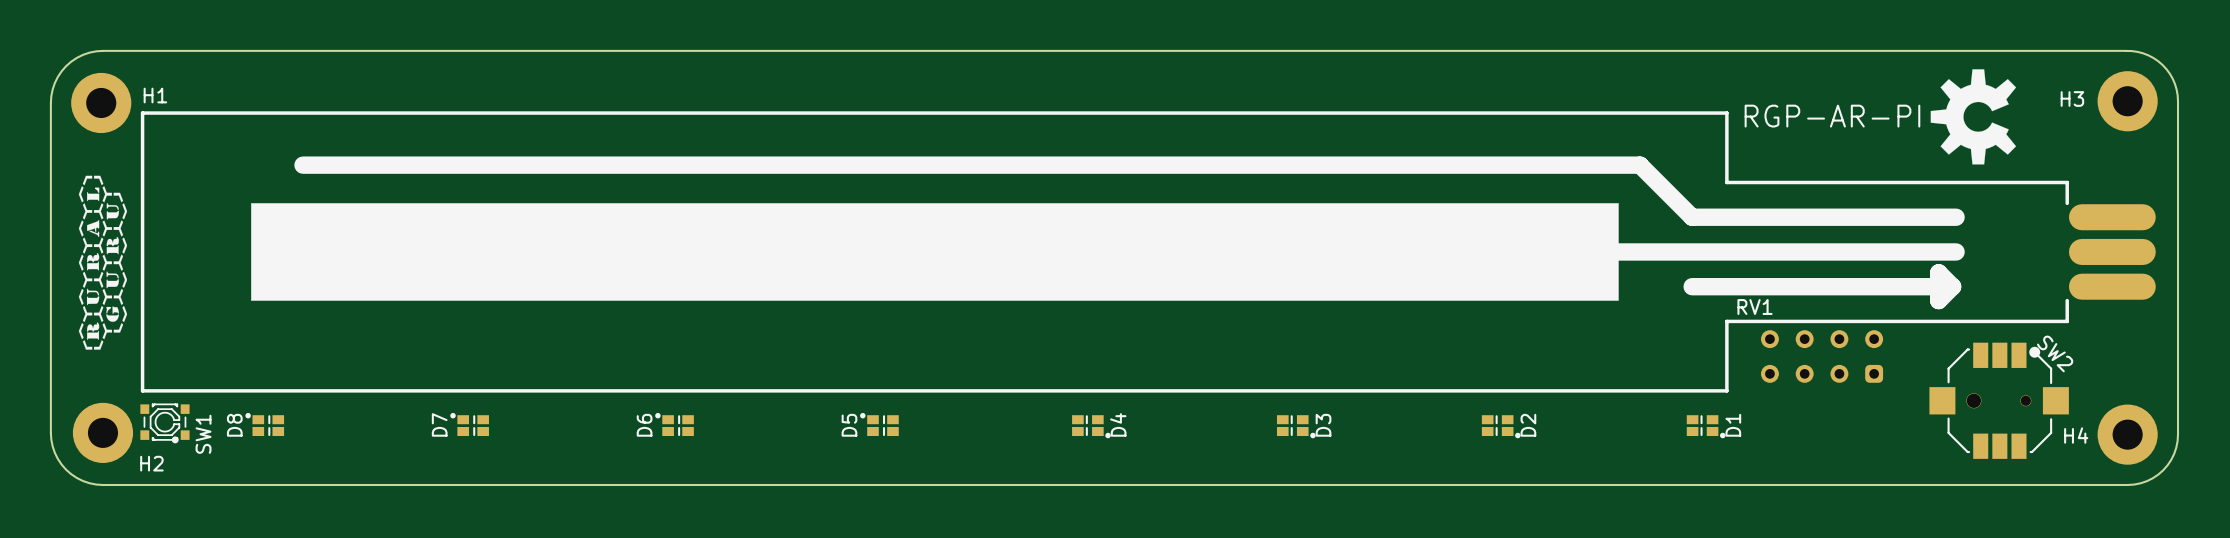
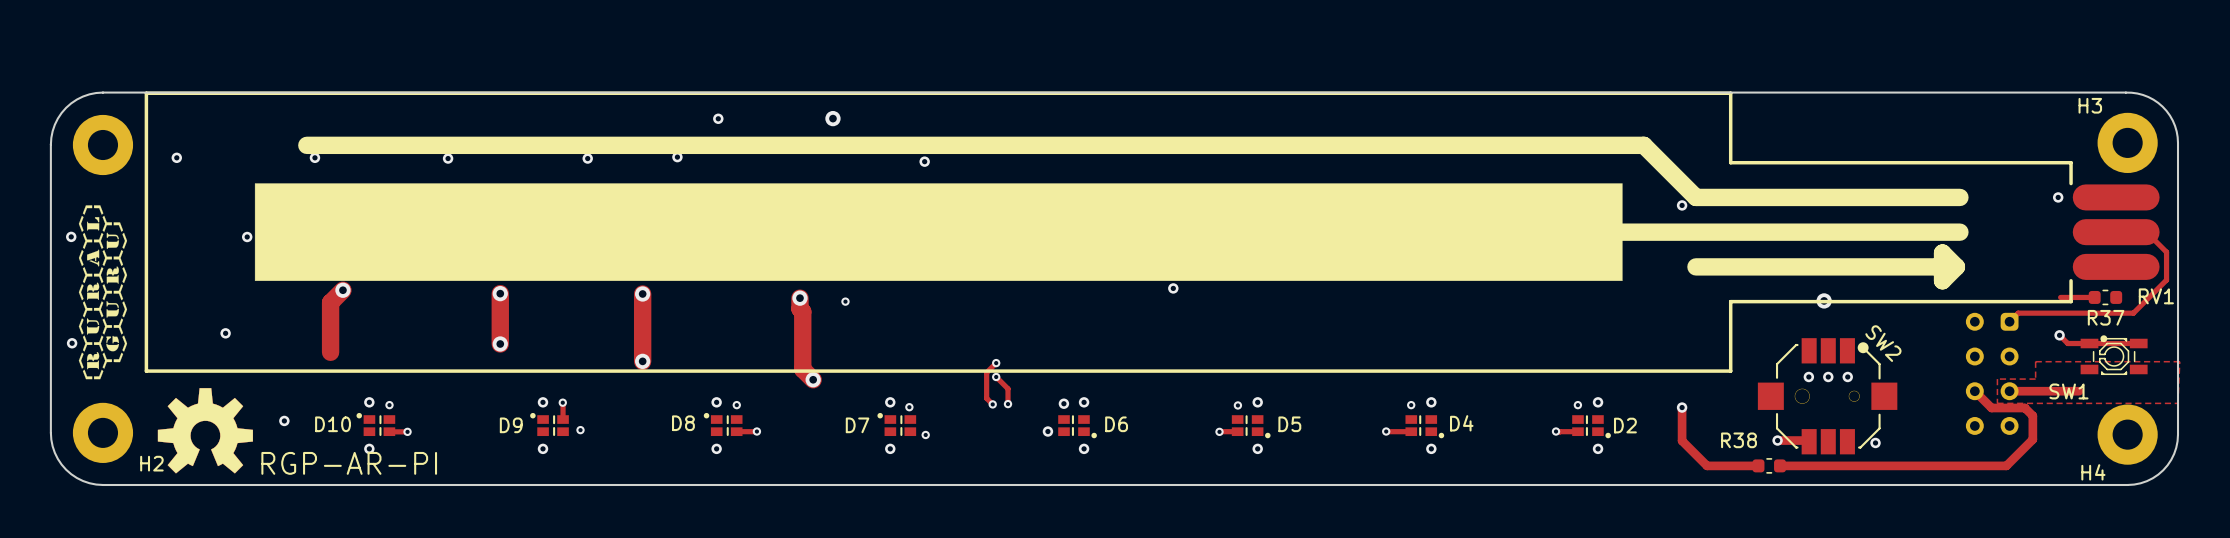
board edge: (2125, 50) (2137, 51) (2153, 58) (2162, 65) (2172, 78) (2177, 95) (2178, 142) -> (2125, 92) (2148, 97) (2162, 106) (2172, 120) (2178, 142)
board edge: (2125, 50) (102, 50) (89, 52) (76, 57) (66, 66) (57, 76) (51, 96) (50, 144) -> (2125, 92) (102, 92) (83, 96) (66, 107) (54, 124) (50, 144)
drawing: [1930, 69, 2017, 165] -> none
H3 name position: H3 (2072, 98) -> H3 (2090, 105)
H3 position: (2127, 101) -> (2127, 142)
H1: (101, 102) -> none
via: none -> (718, 118)
via: none -> (832, 118)
part: none -> (102, 145)
via: none -> (176, 157)
via: none -> (314, 157)
via: none -> (677, 157)
via: none -> (448, 158)
via: none -> (587, 158)
via: none -> (924, 161)
via: none -> (2058, 197)
via: none -> (1682, 205)
track: none -> (2116, 232) (2146, 232) (2166, 252) (2166, 280) (2133, 313) (2018, 313) (2009, 321)
via: none -> (71, 236)
via: none -> (247, 236)
RV1 position: (1148, 251) -> (1152, 232)
drawing position: (102, 262) -> (102, 292)
via: none -> (1173, 288)
track: none -> (342, 290) (330, 302) (330, 352)
via: none -> (342, 290)
track: none -> (500, 293) (500, 343)
via: none -> (500, 293)
track: none -> (642, 293) (642, 361)
via: none -> (642, 293)
track: none -> (2060, 297) (2094, 297)
R37: none -> (2105, 297)
track: none -> (799, 298) (799, 308) (802, 311) (802, 369) (813, 379)
via: none -> (799, 298)
via: none -> (1824, 300)
via: none -> (845, 301)
RV1 name position: RV1 (1755, 307) -> RV1 (2156, 296)
via: none -> (225, 333)
track: none -> (2059, 335) (2067, 343) (2138, 343) (2135, 343)
via: none -> (2059, 335)
via: none -> (72, 343)
via: none -> (500, 343)
SW2 name position: SW2 (2055, 353) -> SW2 (1883, 343)
part rotation: 0° (1822, 356) -> 90° counterclockwise (1992, 373)
part position: (1822, 356) -> (1992, 373)
via: none -> (642, 361)
zone outline: none -> (2035, 361) (2179, 361) (2178, 403) (1997, 403) (1997, 379) (2035, 379) (2035, 361)
track: none -> (996, 363) (986, 372) (986, 398) (992, 404)
via: none -> (996, 363)
track: none -> (996, 376) (1008, 388) (1008, 404)
via: none -> (996, 376)
via: none -> (1808, 376)
via: none -> (1828, 376)
via: none -> (1847, 376)
via: none -> (813, 379)
drawing: none -> [157, 388, 253, 474]
track: none -> (1974, 391) (1991, 407) (2024, 407) (2032, 415) (2032, 439) (2006, 465) (1780, 465)
track: none -> (2009, 391) (2079, 391)
SW2 position: (1999, 400) -> (1827, 396)
via: none -> (369, 402)
via: none -> (542, 402)
track: none -> (562, 402) (563, 419)
via: none -> (562, 402)
via: none -> (716, 402)
via: none -> (890, 402)
via: none -> (1084, 402)
via: none -> (1257, 402)
via: none -> (1431, 402)
via: none -> (1598, 402)
SW1 footprint: [140, 403, 190, 444] -> [2080, 335, 2148, 375]
via: none -> (1063, 403)
via: none -> (992, 404)
via: none -> (1008, 404)
via: none -> (389, 405)
via: none -> (736, 405)
via: none -> (1237, 405)
via: none -> (1411, 405)
via: none -> (1577, 405)
via: none -> (909, 407)
track: none -> (1682, 407) (1682, 440) (1707, 465) (1758, 465)
via: none -> (1682, 407)
D8 footprint: [245, 412, 285, 437] -> [703, 412, 743, 437]
D7 footprint: [450, 412, 489, 437] -> [877, 412, 917, 437]
D6 footprint: [655, 412, 694, 437] -> [1058, 415, 1097, 439]
D5 footprint: [860, 412, 899, 437] -> [1231, 415, 1271, 439]
D4 footprint: [1072, 415, 1111, 439] -> [1405, 415, 1445, 439]
D2 footprint: [1481, 415, 1521, 439] -> [1572, 415, 1611, 439]
via: none -> (284, 420)
D10: none -> (375, 424)
D9: none -> (549, 424)
D6 name position: D6 (644, 425) -> D6 (1116, 424)
D5 name position: D5 (849, 425) -> D5 (1289, 424)
D3: (1296, 426) -> none
D1: (1706, 426) -> none
via: none -> (580, 430)
track: none -> (389, 431) (407, 431)
via: none -> (407, 431)
track: none -> (736, 431) (756, 431)
via: none -> (756, 431)
via: none -> (1047, 431)
track: none -> (1219, 431) (1237, 431)
via: none -> (1219, 431)
track: none -> (1386, 431) (1411, 431)
via: none -> (1386, 431)
track: none -> (1556, 431) (1577, 431)
via: none -> (1556, 431)
SW1 name position: SW1 (203, 434) -> SW1 (2068, 391)
via: none -> (925, 434)
H4 name position: H4 (2076, 435) -> H4 (2093, 472)
via: none -> (1777, 440)
track: none -> (1807, 440) (1809, 441) (1777, 440)
via: none -> (1875, 442)
via: none -> (369, 448)
via: none -> (542, 448)
via: none -> (716, 448)
via: none -> (890, 448)
via: none -> (1084, 448)
via: none -> (1257, 448)
via: none -> (1431, 448)
via: none -> (1598, 448)
R38: none -> (1769, 465)

